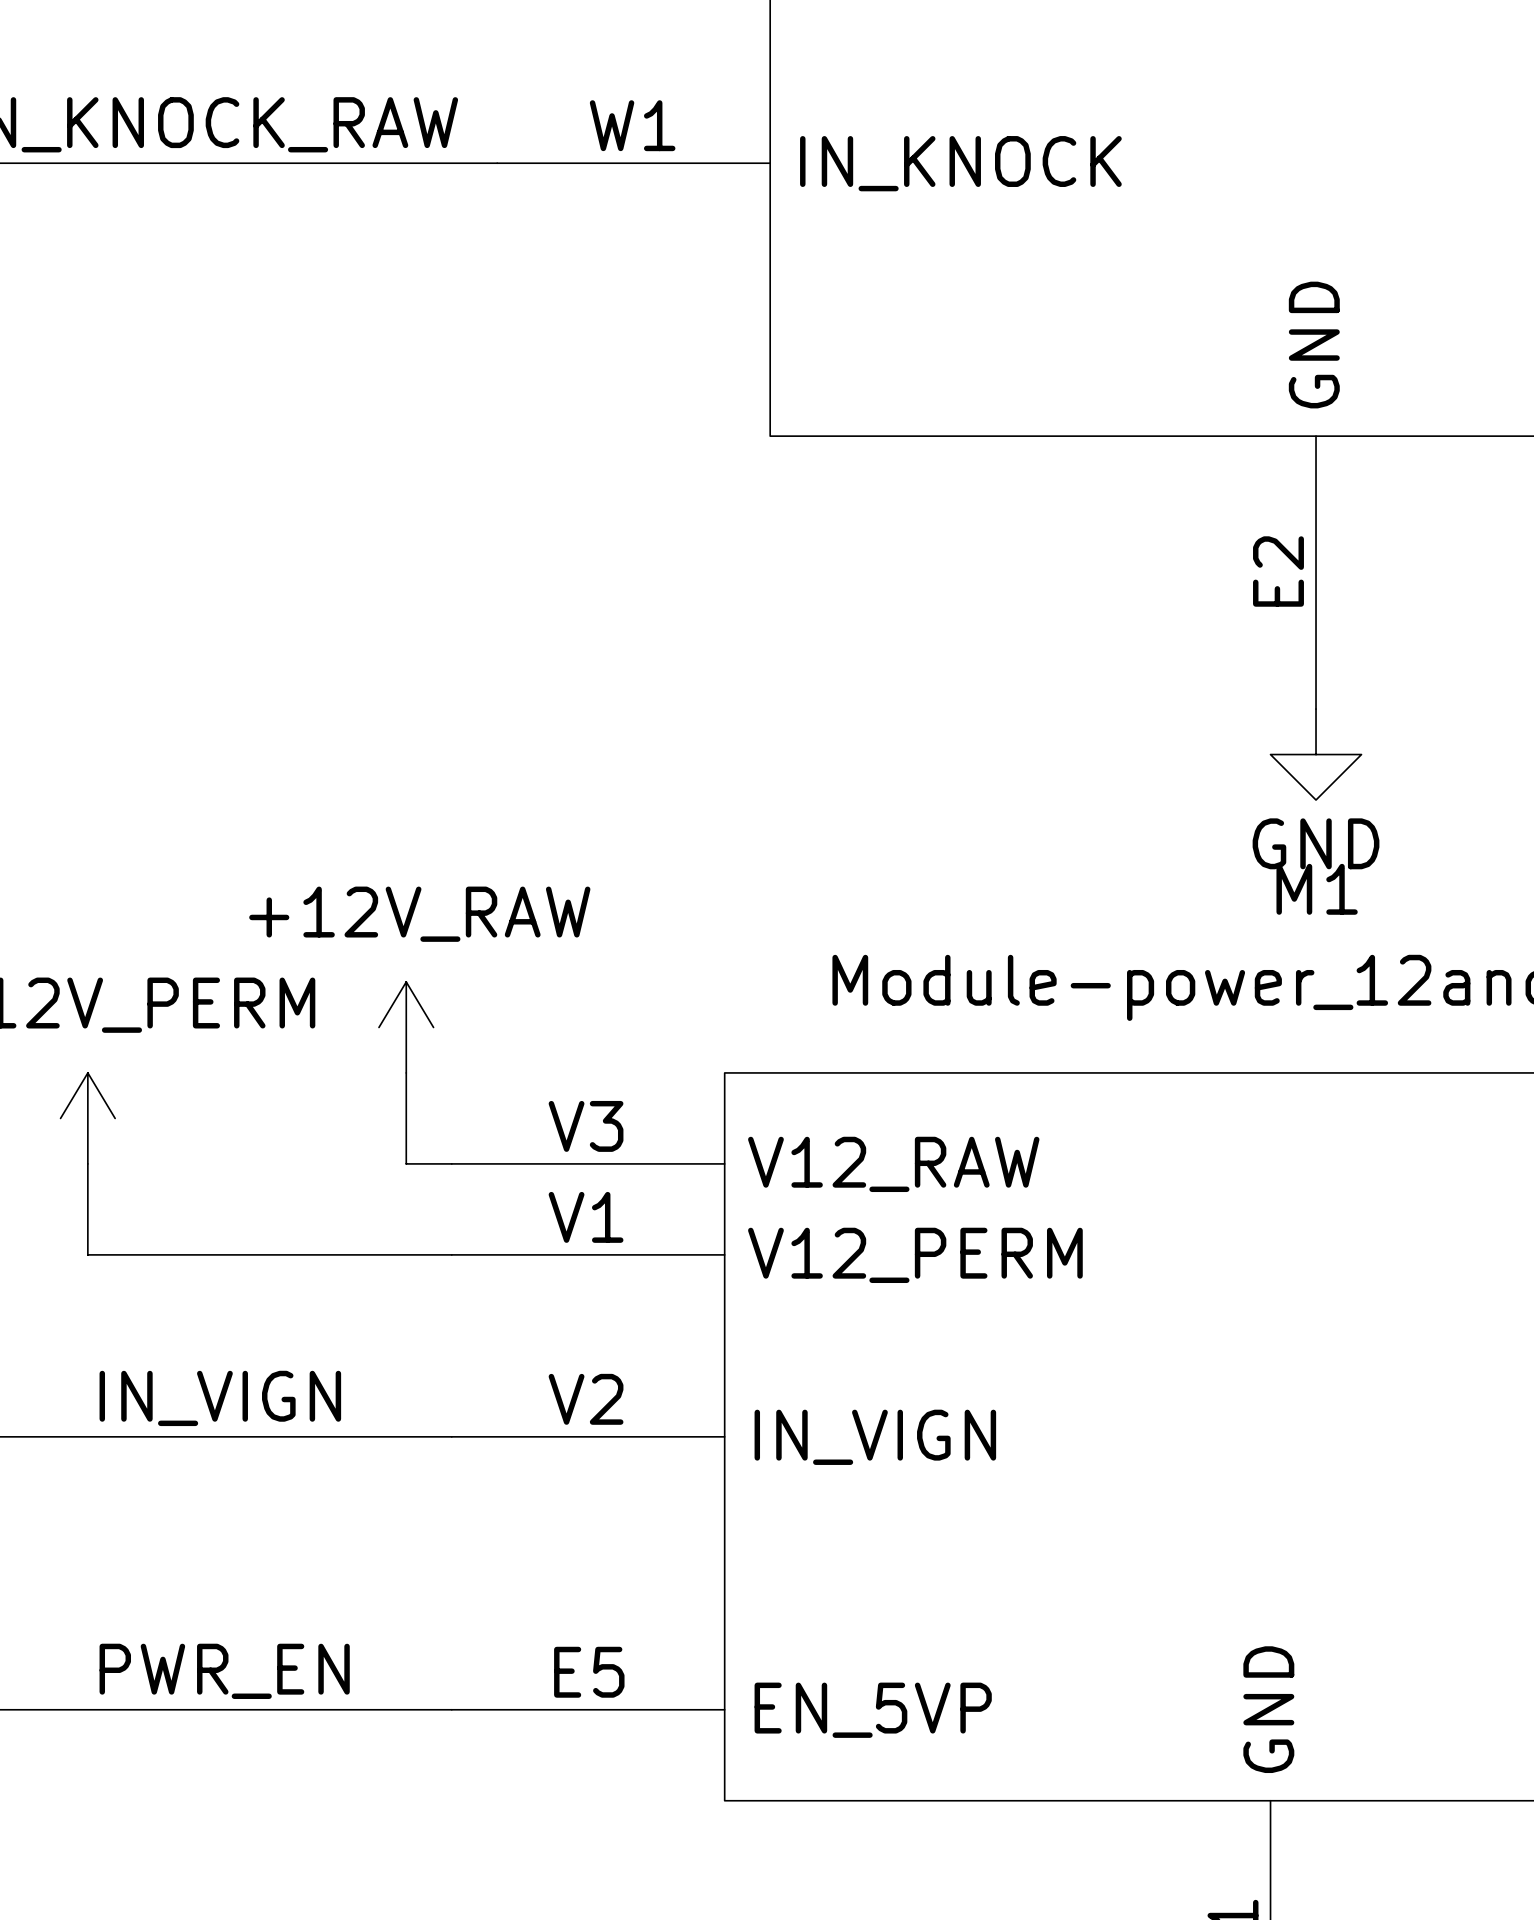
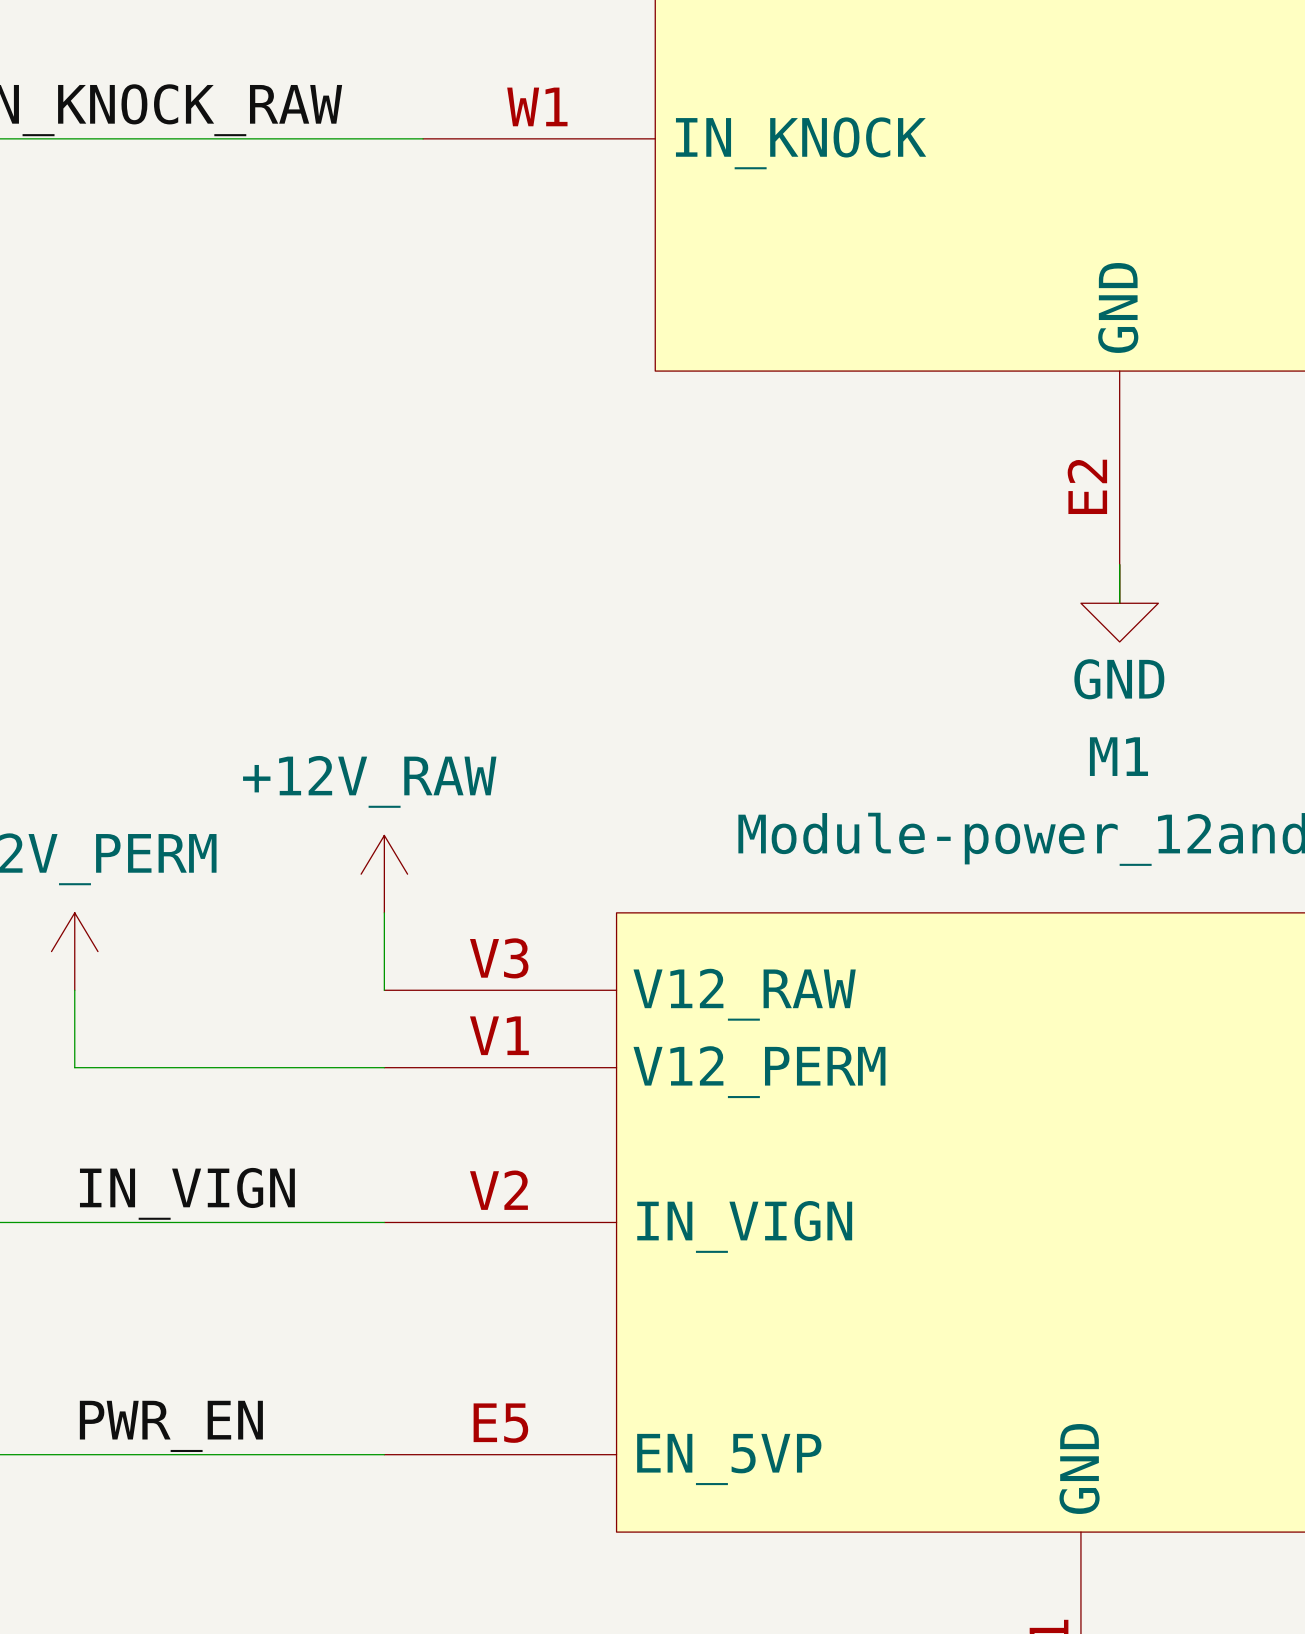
power symbol position: GND (1316, 754) -> GND (1119, 603)
power symbol position: +12V_RAW (406, 1027) -> +12V_RAW (384, 874)
wire: (406, 1072) (406, 1163) (451, 1163) -> (384, 912) (384, 990)

